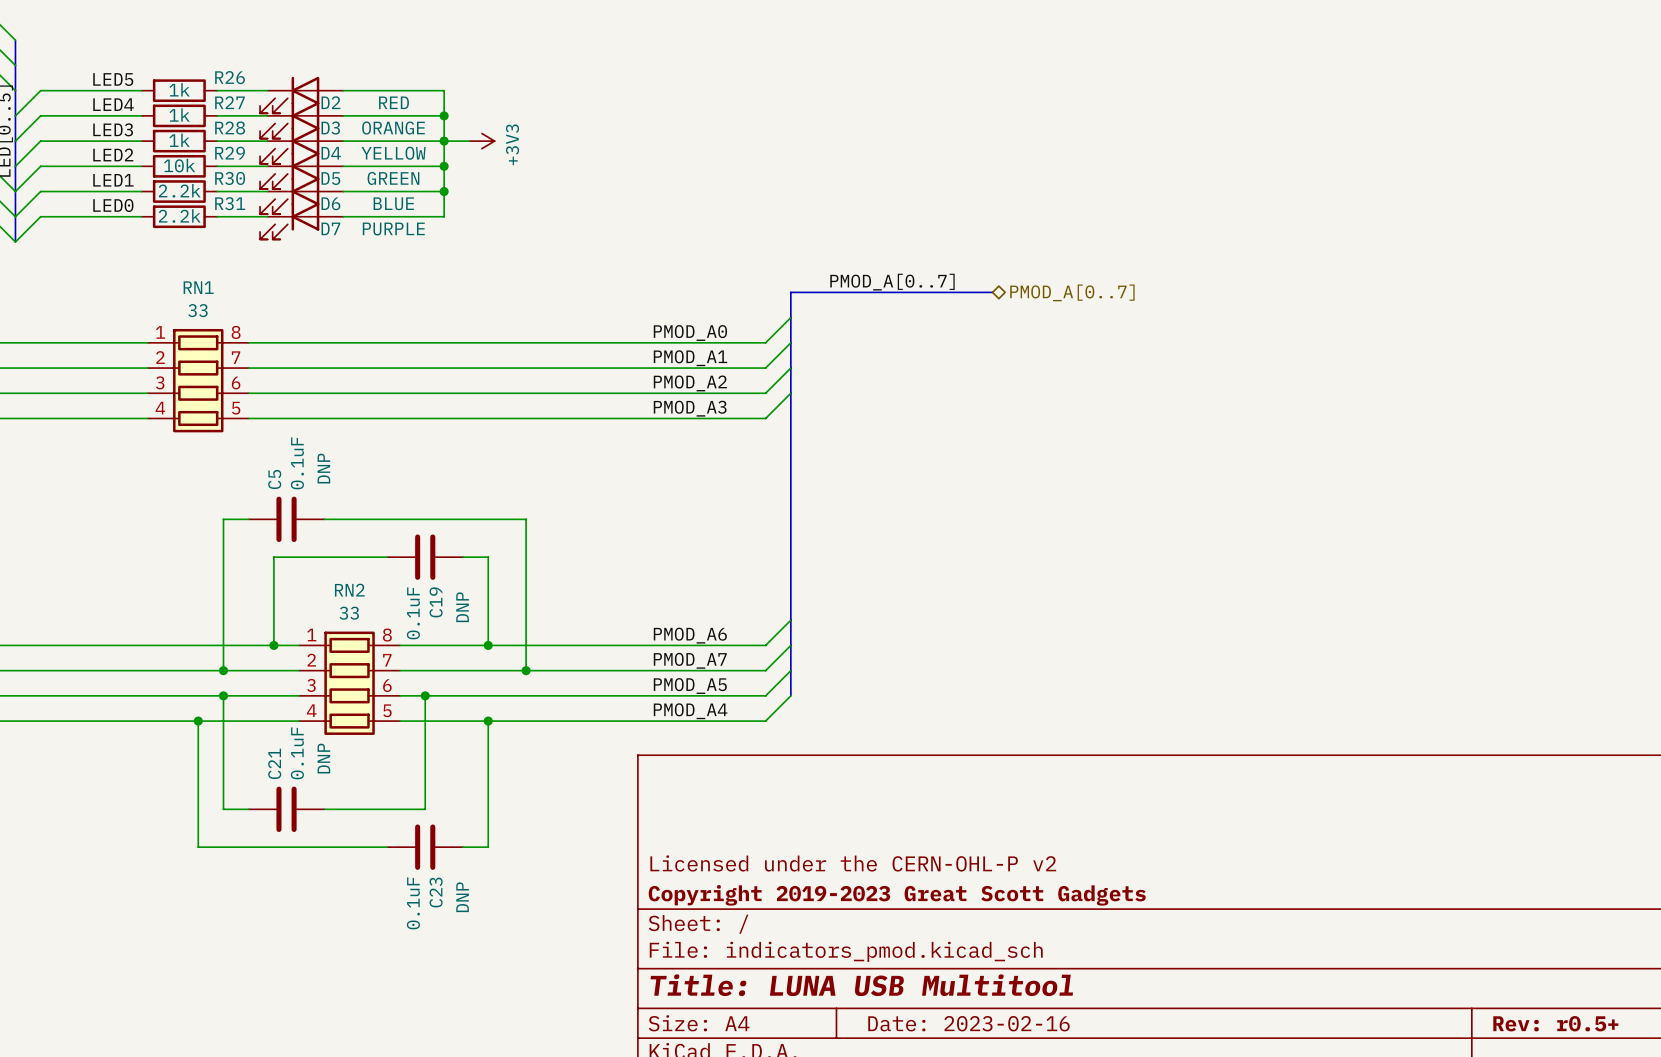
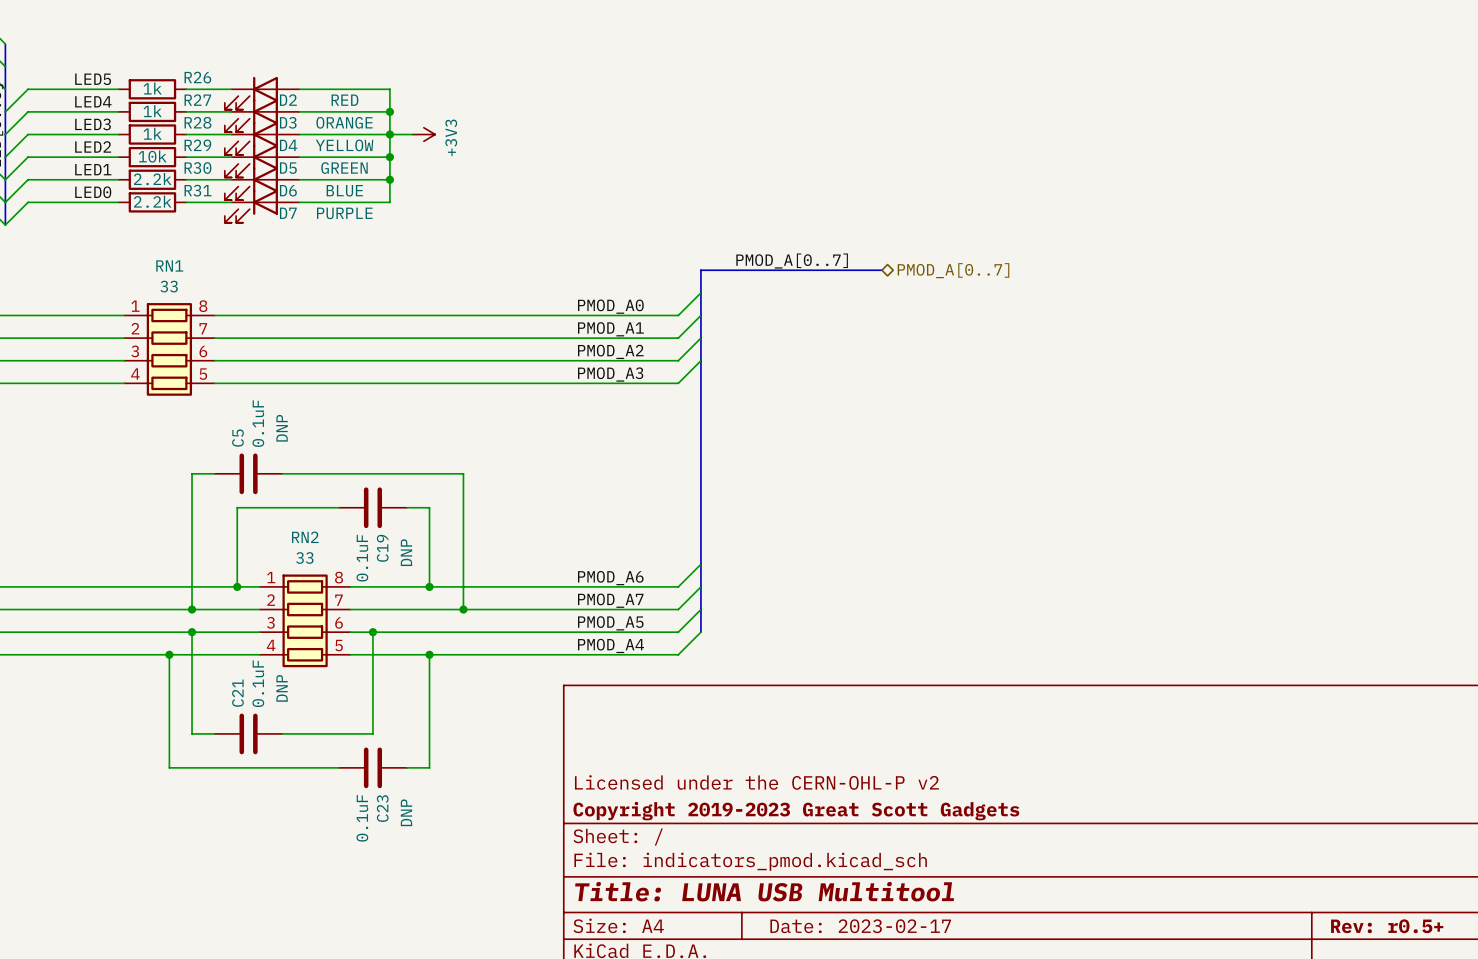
title block: Date: 2023-02-16 (968, 1023) -> Date: 2023-02-17 (860, 926)

